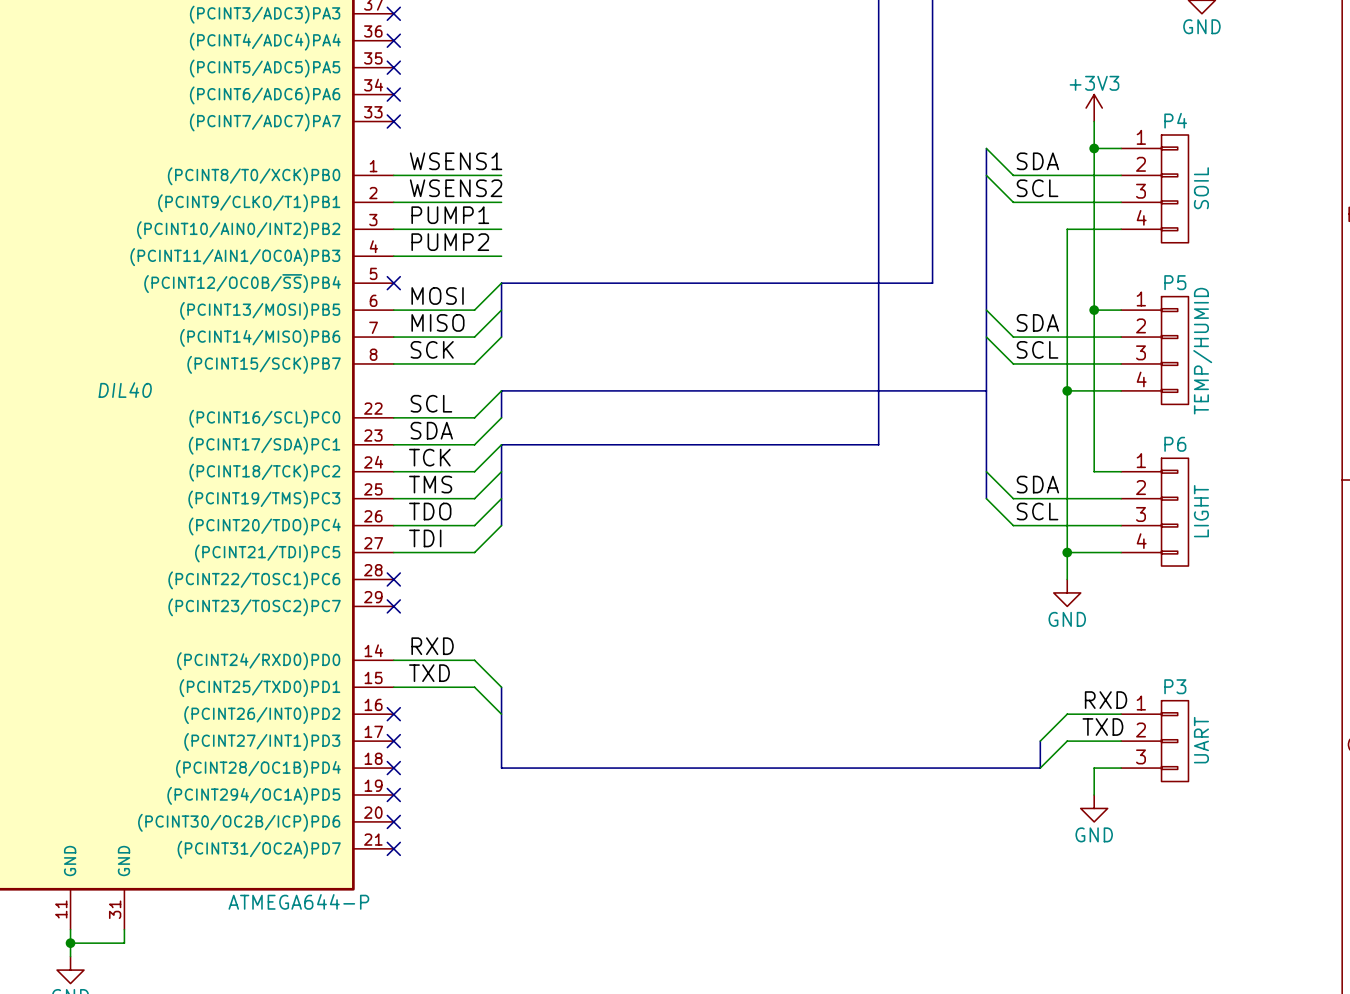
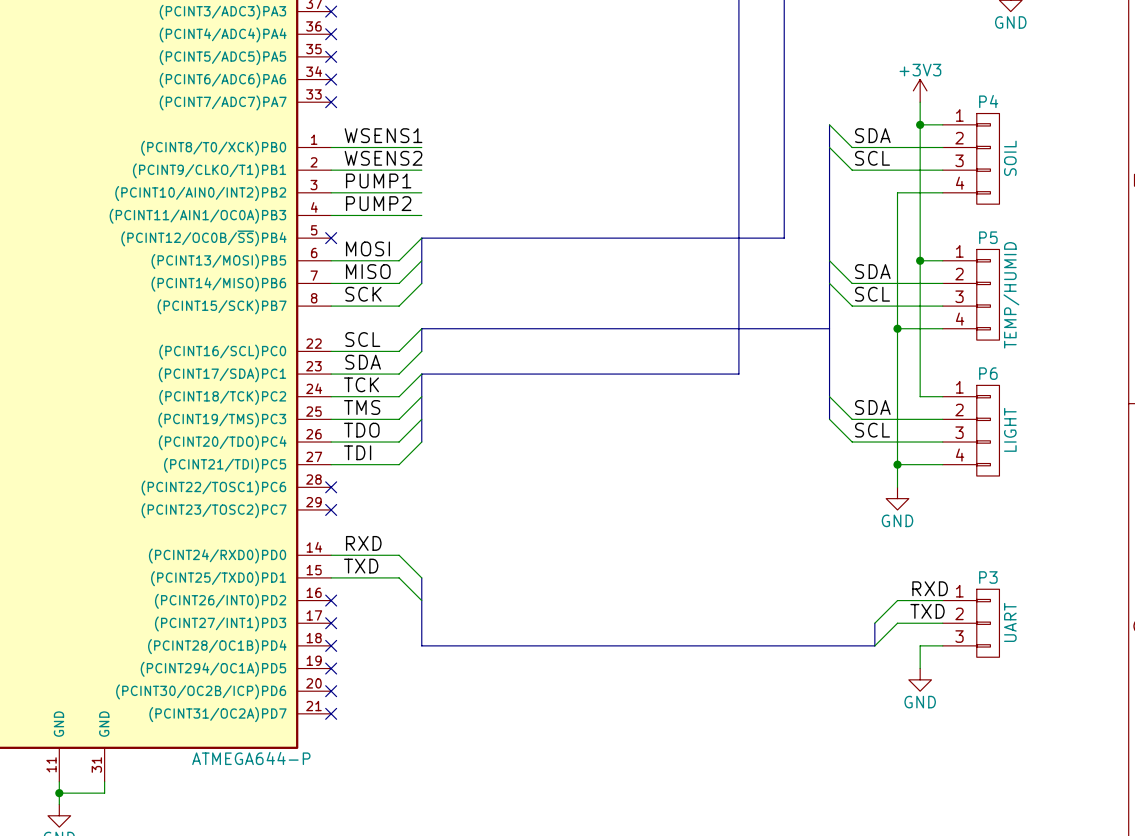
part text: DIL40 (125, 390) -> none

